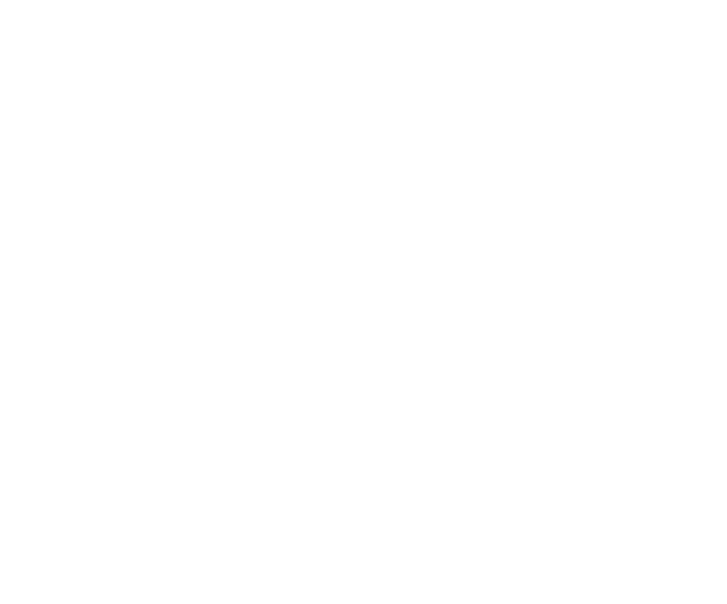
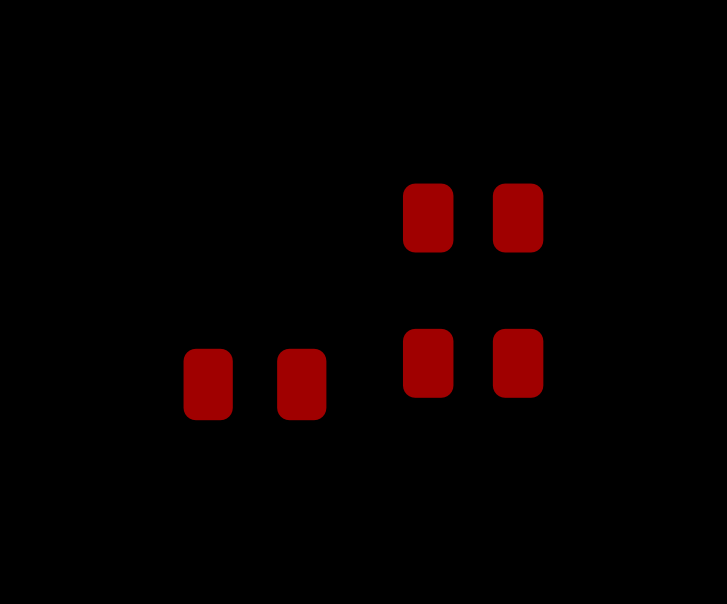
part: none -> (473, 218)
part: none -> (473, 363)
part: none -> (254, 384)

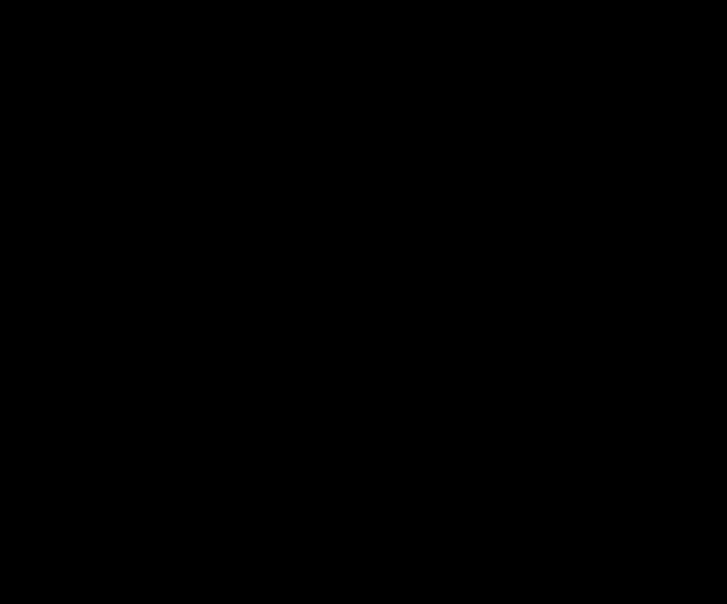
part: (473, 218) -> none
part: (473, 363) -> none
part: (254, 384) -> none

